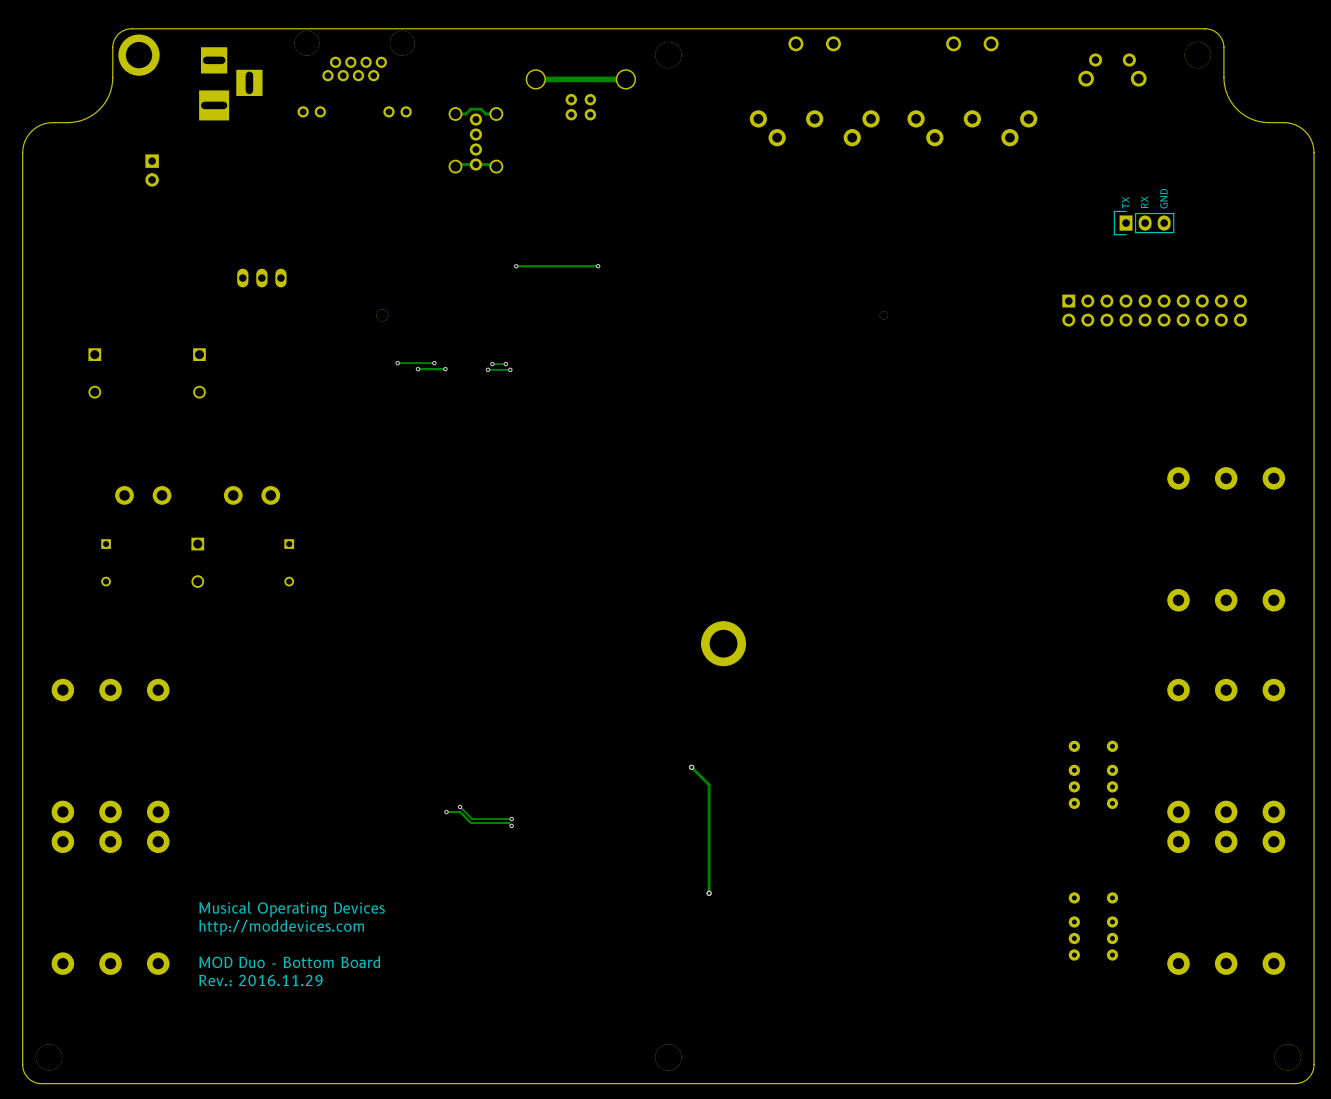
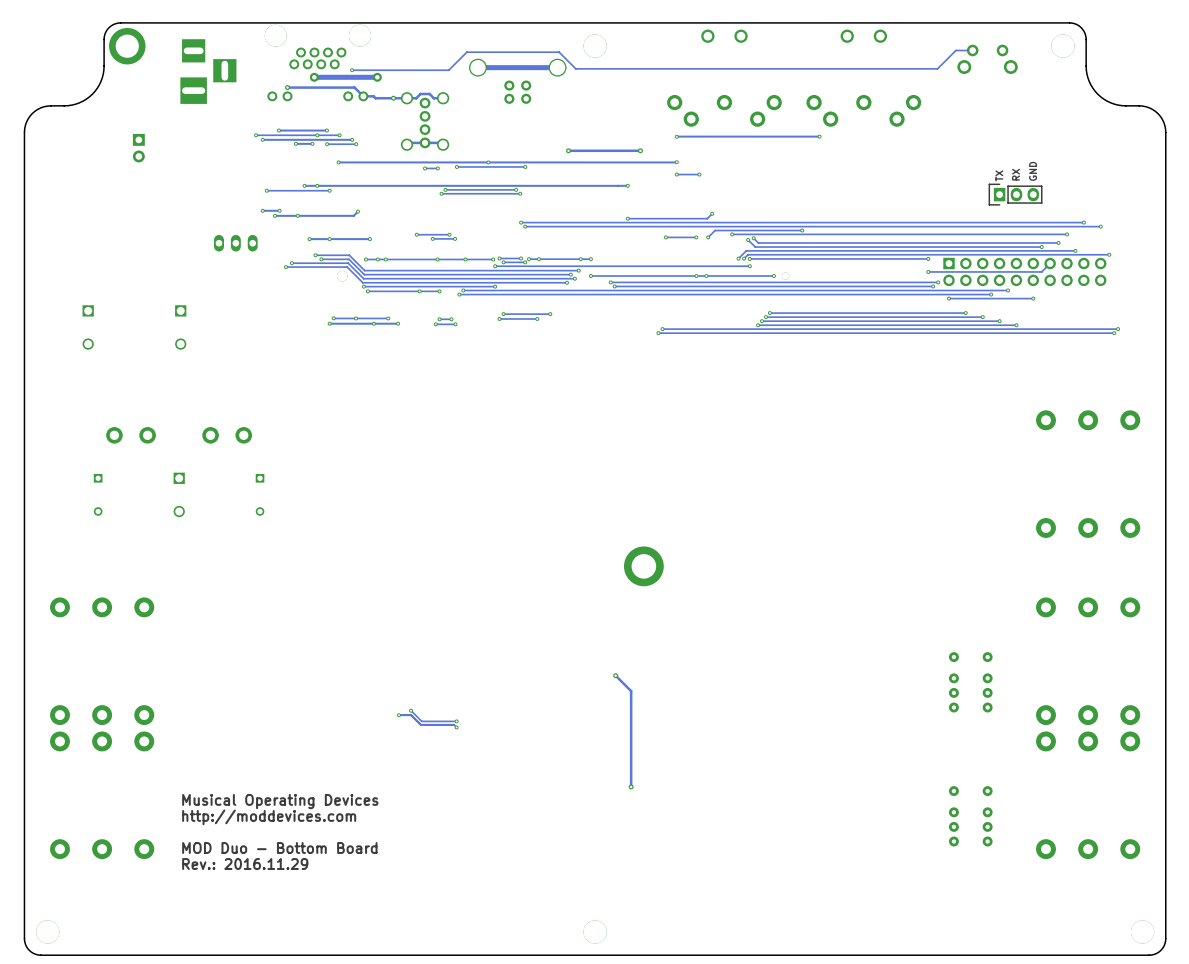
track: none -> (972, 50) (955, 50) (937, 68) (575, 68) (559, 52) (466, 52) (448, 70) (352, 70)
via: none -> (352, 70)
via: none -> (314, 77)
track: none -> (377, 77) (314, 77)
via: none -> (377, 77)
track: none -> (287, 87) (354, 87) (363, 96) (407, 98)
via: none -> (287, 87)
via: none -> (393, 98)
via: none -> (278, 130)
track: none -> (326, 130) (278, 130)
via: none -> (326, 130)
via: none -> (256, 135)
via: none -> (317, 135)
track: none -> (339, 135) (256, 135)
via: none -> (339, 135)
via: none -> (676, 136)
track: none -> (819, 136) (676, 136)
via: none -> (819, 136)
via: none -> (262, 139)
track: none -> (352, 139) (262, 139)
via: none -> (352, 139)
via: none -> (295, 143)
track: none -> (312, 143) (295, 143)
via: none -> (312, 143)
via: none -> (327, 144)
track: none -> (356, 144) (327, 144)
via: none -> (356, 144)
via: none -> (568, 150)
track: none -> (640, 150) (568, 150)
via: none -> (640, 150)
via: none -> (338, 162)
via: none -> (488, 162)
track: none -> (676, 162) (338, 162)
via: none -> (676, 162)
via: none -> (456, 166)
track: none -> (525, 166) (456, 166)
via: none -> (525, 166)
via: none -> (425, 168)
track: none -> (437, 168) (425, 168)
via: none -> (437, 168)
via: none -> (676, 174)
track: none -> (699, 174) (676, 174)
via: none -> (699, 174)
via: none -> (304, 185)
via: none -> (317, 185)
track: none -> (627, 185) (304, 185)
via: none -> (627, 185)
via: none -> (445, 189)
track: none -> (515, 189) (445, 189)
via: none -> (516, 189)
via: none -> (266, 190)
track: none -> (329, 190) (266, 190)
via: none -> (329, 190)
via: none -> (441, 193)
track: none -> (520, 193) (441, 193)
via: none -> (520, 193)
via: none -> (262, 210)
track: none -> (279, 210) (262, 210)
via: none -> (279, 210)
track: none -> (357, 211) (353, 215) (275, 215)
via: none -> (357, 211)
track: none -> (712, 213) (707, 218) (627, 218)
via: none -> (712, 213)
via: none -> (275, 215)
via: none -> (297, 215)
via: none -> (627, 218)
via: none -> (521, 222)
track: none -> (1083, 222) (521, 222)
via: none -> (1083, 222)
via: none -> (525, 226)
track: none -> (1100, 226) (525, 226)
via: none -> (1100, 226)
track: none -> (802, 230) (715, 230) (708, 237)
via: none -> (802, 230)
via: (516, 266) -> none
track: (598, 266) (516, 266) -> none
via: (598, 266) -> none
via: none -> (416, 234)
track: none -> (449, 234) (416, 234)
via: none -> (449, 234)
via: none -> (732, 234)
track: none -> (1067, 234) (732, 234)
via: none -> (1067, 234)
via: none -> (665, 237)
track: none -> (696, 237) (665, 237)
via: none -> (696, 237)
via: none -> (708, 237)
track: none -> (753, 238) (758, 242) (1058, 242)
via: none -> (753, 238)
via: none -> (309, 239)
via: none -> (329, 239)
track: none -> (369, 239) (309, 239)
via: none -> (369, 239)
via: none -> (432, 238)
track: none -> (455, 238) (432, 238)
via: none -> (455, 238)
track: none -> (748, 239) (755, 247) (1041, 247)
via: none -> (748, 239)
via: none -> (1058, 242)
via: none -> (1041, 247)
track: none -> (1075, 250) (746, 250) (738, 258)
via: none -> (1075, 250)
track: none -> (315, 255) (349, 255) (364, 270) (578, 270)
via: none -> (315, 255)
track: none -> (1109, 254) (747, 254) (744, 258)
via: none -> (1109, 254)
via: none -> (499, 258)
track: none -> (521, 258) (499, 258)
via: none -> (521, 258)
via: none -> (738, 258)
via: none -> (744, 258)
via: none -> (749, 258)
track: none -> (928, 258) (749, 258)
via: none -> (928, 258)
track: none -> (321, 259) (349, 259) (364, 274) (570, 274)
via: none -> (321, 259)
via: none -> (365, 259)
via: none -> (377, 259)
via: none -> (385, 259)
via: none -> (437, 259)
via: none -> (465, 259)
track: none -> (493, 259) (365, 259)
via: none -> (493, 259)
via: none -> (529, 259)
via: none -> (538, 259)
via: none -> (580, 259)
track: none -> (590, 259) (529, 259)
via: none -> (590, 259)
via: none -> (503, 262)
track: none -> (525, 262) (503, 262)
via: none -> (525, 262)
track: none -> (291, 263) (348, 263) (363, 278) (574, 278)
via: none -> (291, 263)
track: none -> (1050, 263) (1041, 271) (928, 271)
via: none -> (495, 266)
track: none -> (749, 266) (495, 266)
via: none -> (749, 266)
track: none -> (286, 267) (347, 267) (362, 282) (566, 282)
via: none -> (286, 267)
via: none -> (578, 270)
via: none -> (928, 271)
via: none -> (570, 274)
via: none -> (590, 276)
via: none -> (696, 276)
via: none -> (706, 276)
track: none -> (773, 276) (590, 276)
via: none -> (773, 276)
via: none -> (574, 278)
via: none -> (566, 282)
via: none -> (610, 282)
track: none -> (938, 282) (610, 282)
via: none -> (938, 282)
via: none -> (614, 286)
track: none -> (933, 286) (614, 286)
via: none -> (933, 286)
via: none -> (363, 286)
track: none -> (495, 286) (363, 286)
via: none -> (495, 286)
via: none -> (463, 290)
track: none -> (1008, 290) (463, 290)
via: none -> (1008, 290)
via: none -> (367, 291)
via: none -> (419, 291)
track: none -> (439, 291) (367, 291)
via: none -> (439, 291)
via: none -> (459, 294)
track: none -> (991, 294) (459, 294)
via: none -> (991, 294)
via: none -> (949, 298)
track: none -> (1033, 298) (949, 298)
via: none -> (1033, 298)
via: none -> (769, 313)
track: none -> (965, 313) (769, 313)
via: none -> (965, 313)
via: none -> (503, 314)
track: none -> (550, 314) (503, 314)
via: none -> (550, 314)
via: none -> (766, 317)
track: none -> (982, 317) (766, 317)
via: none -> (982, 317)
track: none -> (333, 318) (355, 318)
via: none -> (333, 318)
via: none -> (499, 318)
track: none -> (537, 318) (499, 318)
via: none -> (537, 318)
via: none -> (761, 321)
track: none -> (999, 321) (761, 321)
via: none -> (999, 321)
via: none -> (329, 323)
track: none -> (373, 323) (329, 323)
via: none -> (758, 325)
track: none -> (1016, 325) (758, 325)
via: none -> (1016, 325)
via: none -> (662, 329)
track: none -> (1118, 329) (662, 329)
via: none -> (1118, 329)
via: none -> (658, 333)
track: none -> (1114, 333) (658, 333)
via: none -> (1114, 333)

